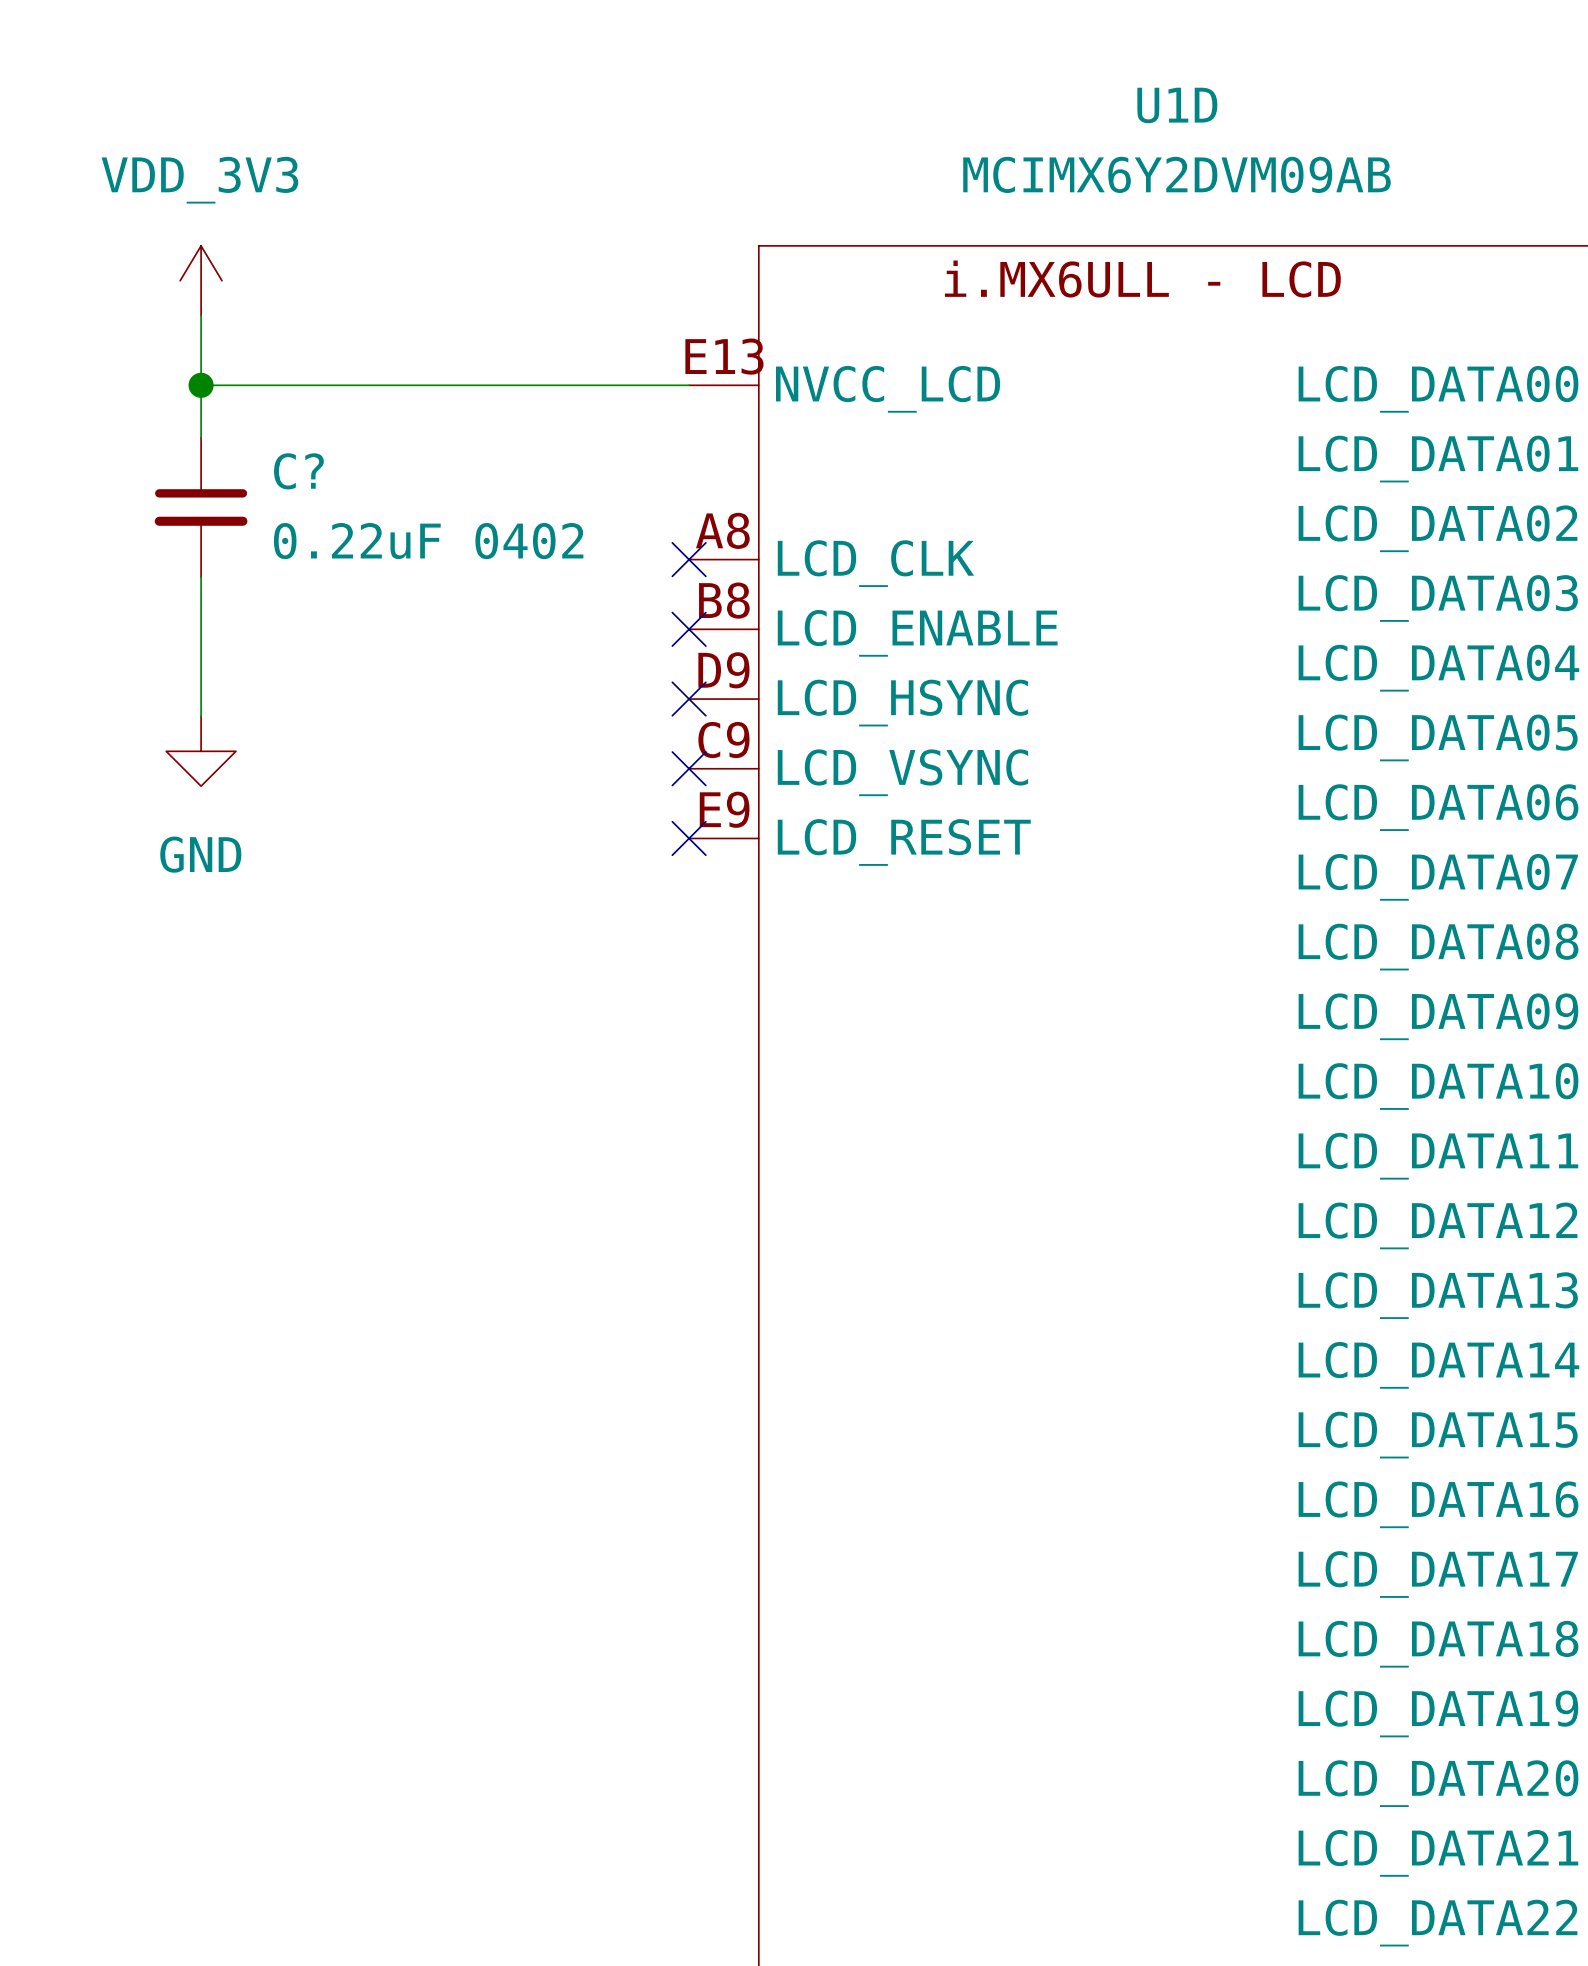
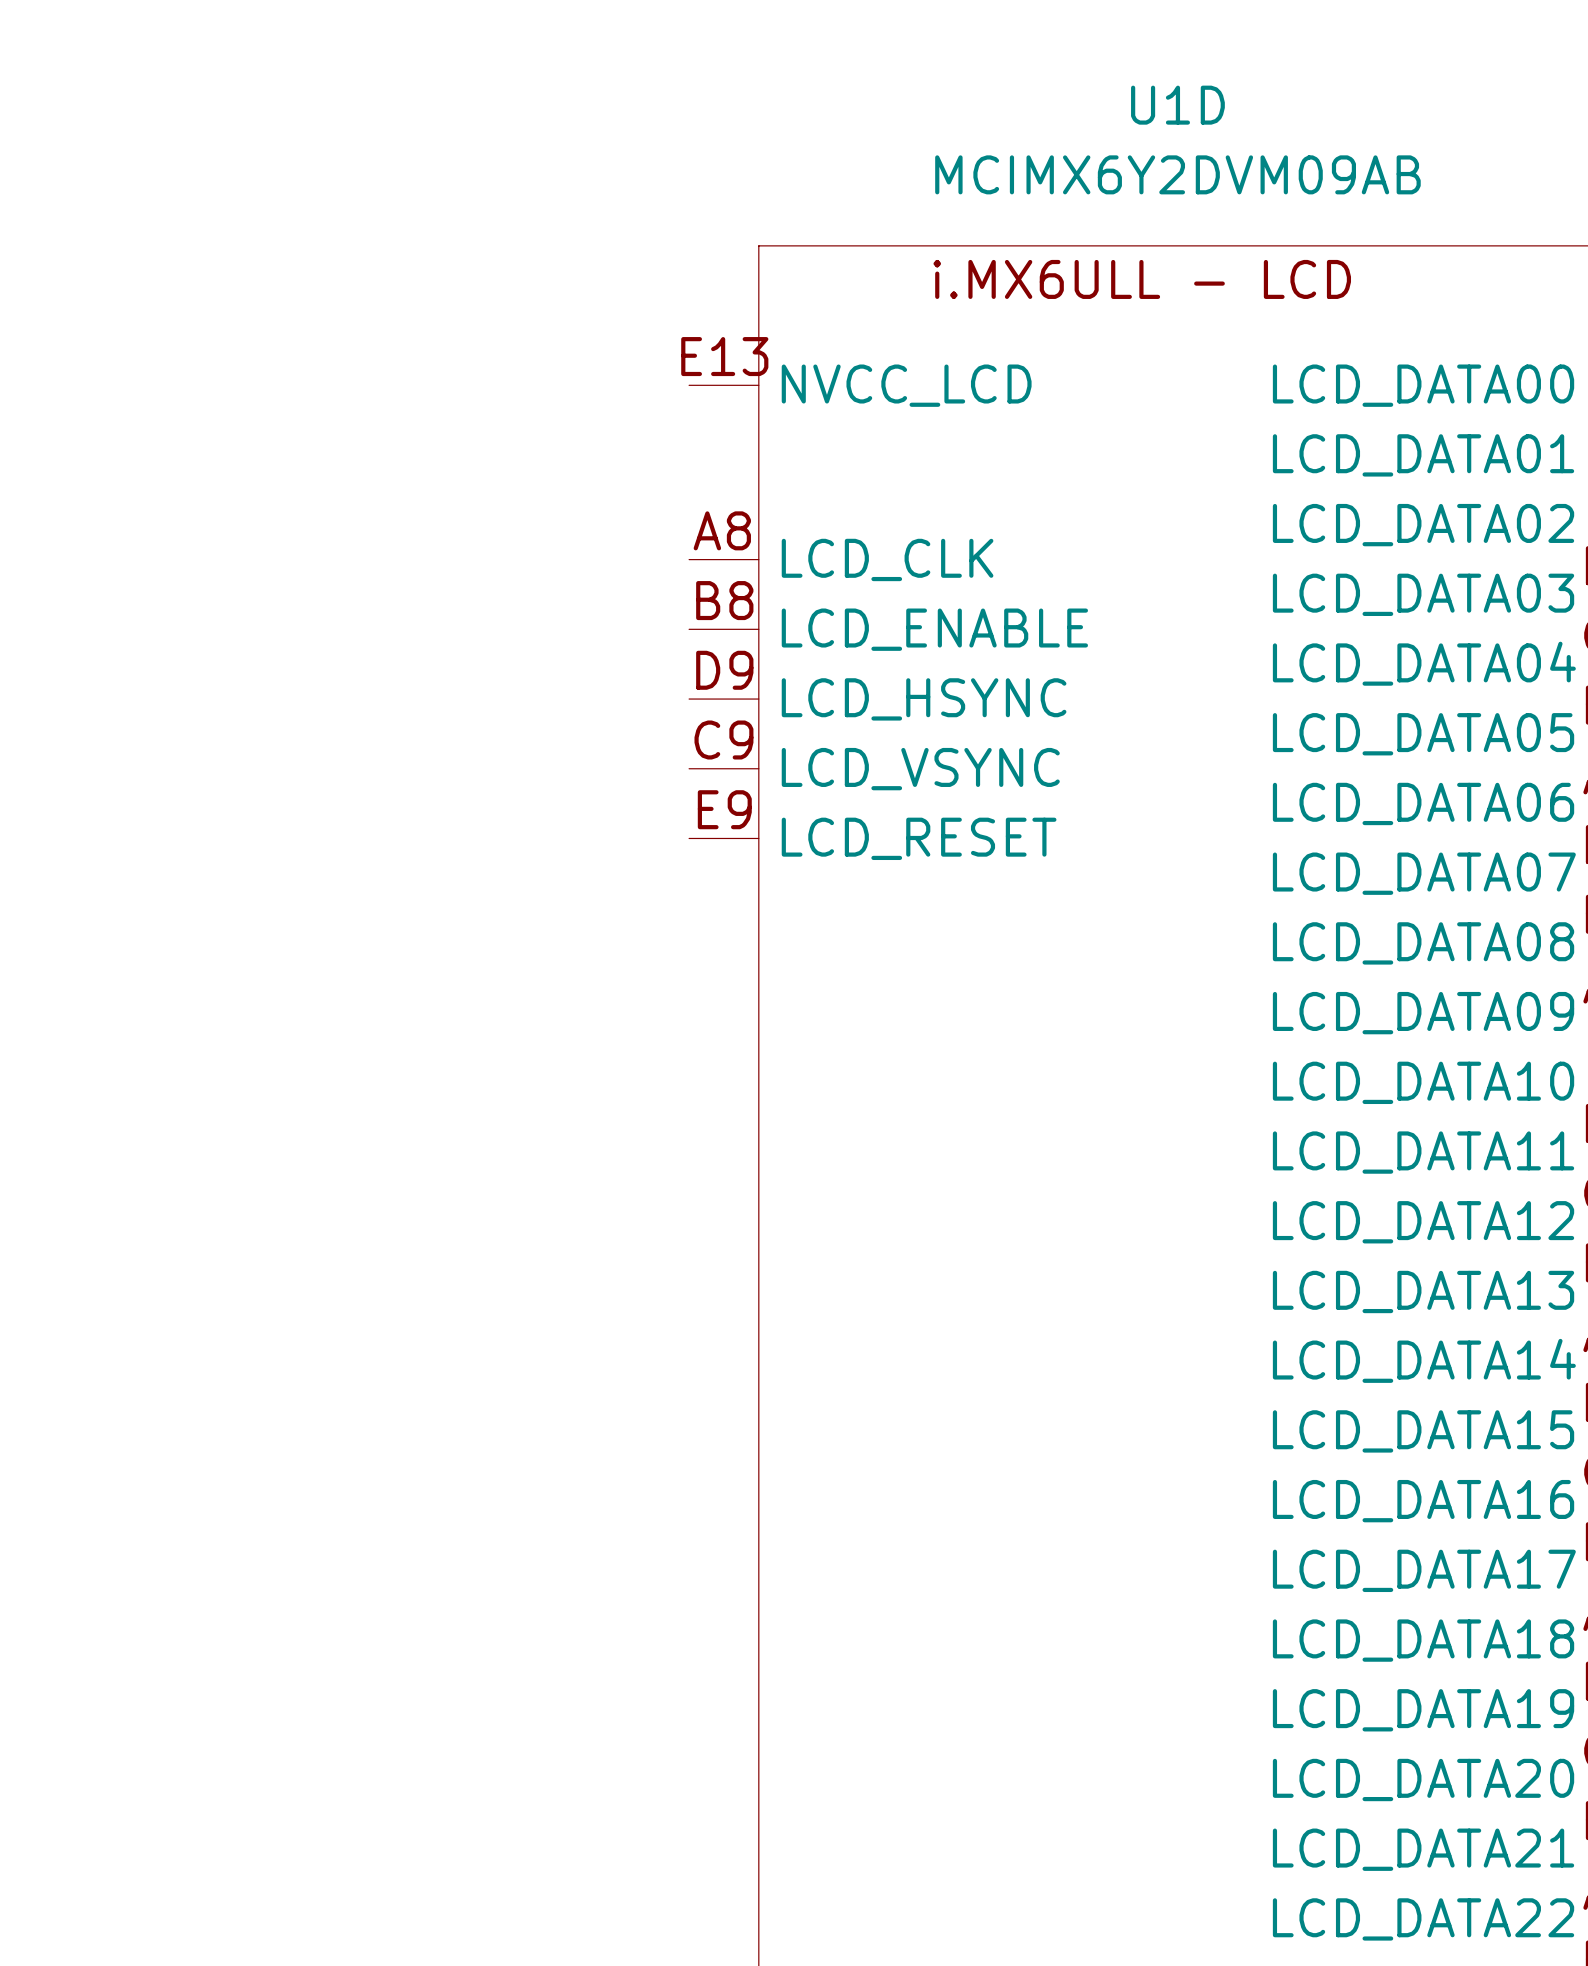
power symbol: VDD_3V3 (201, 280) -> none
wire: (201, 315) (201, 437) -> none
wire: (201, 385) (689, 385) -> none
junction: (201, 385) -> none
C?: 0.22uF 0402 (201, 507) -> none
no-connect mark: (689, 559) -> none
wire: (201, 577) (201, 716) -> none
no-connect mark: (689, 629) -> none
no-connect mark: (689, 699) -> none
power symbol: GND (201, 751) -> none
no-connect mark: (689, 768) -> none
no-connect mark: (689, 838) -> none

